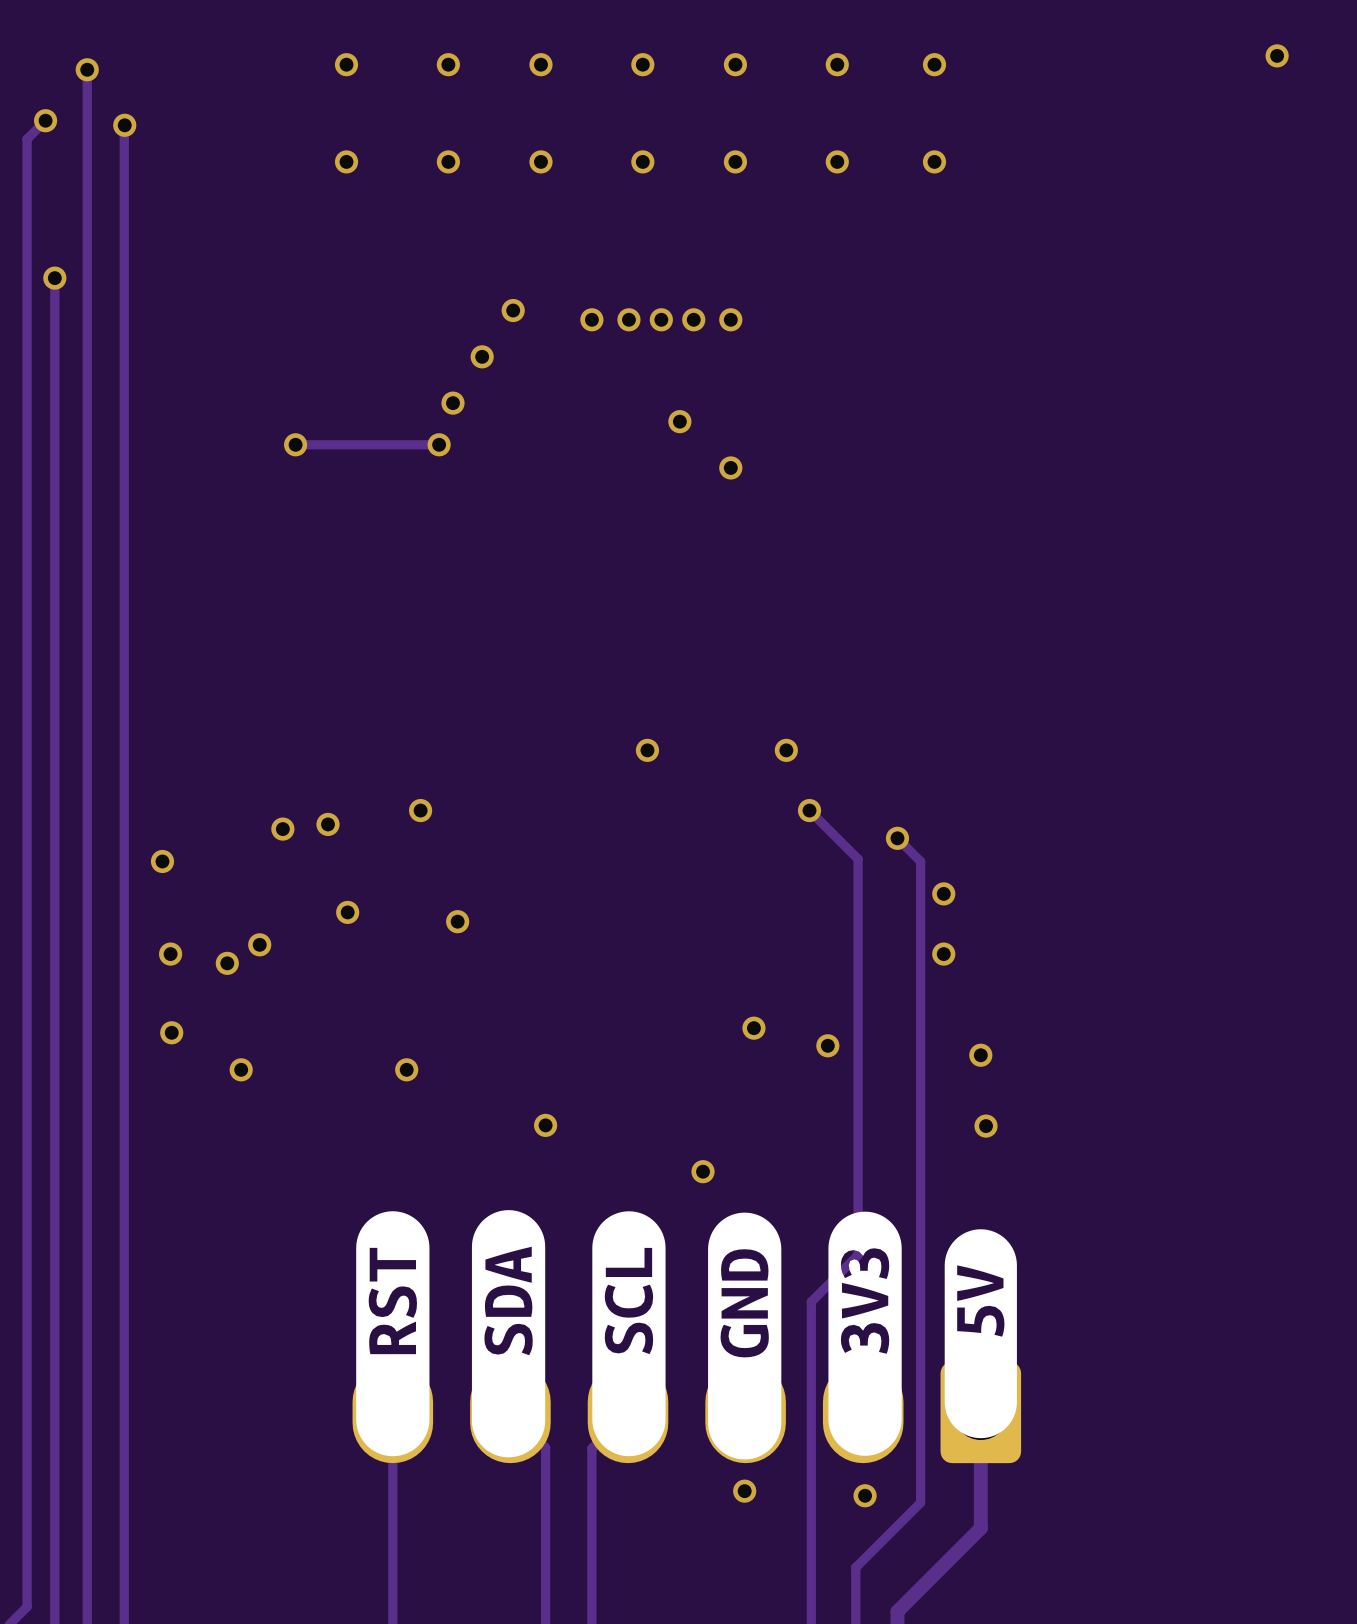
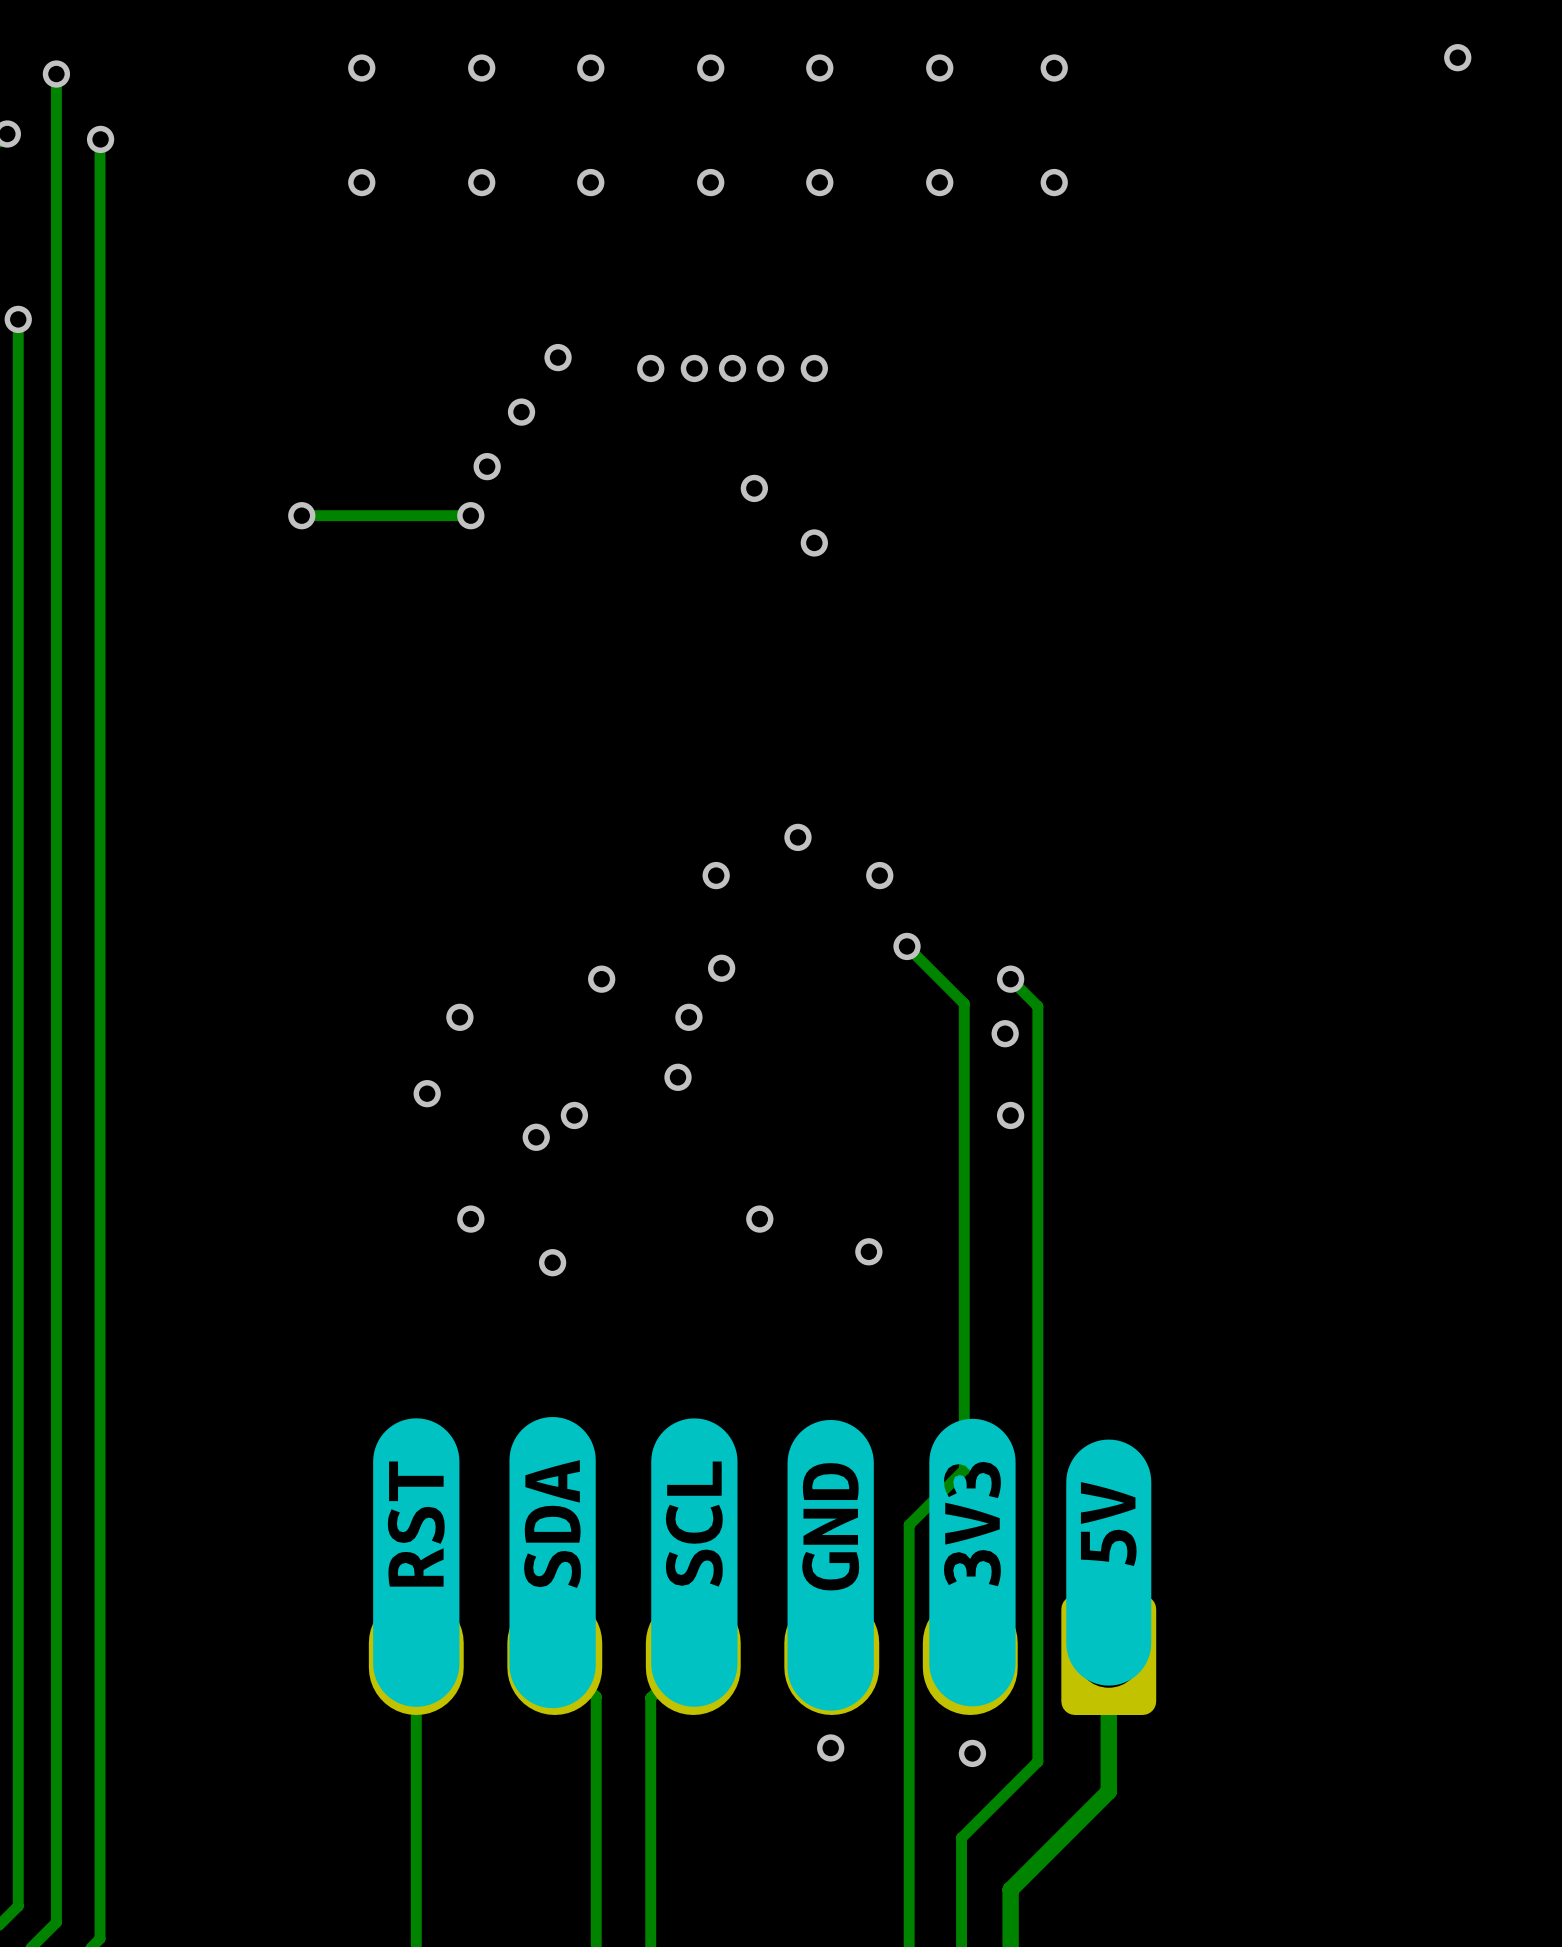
via: none -> (797, 837)
via: (420, 810) -> none
via: (328, 824) -> none
via: (282, 829) -> none
via: none -> (721, 968)
via: none -> (601, 979)
via: (162, 861) -> none
via: none -> (459, 1017)
via: none -> (688, 1017)
via: none -> (1005, 1033)
via: (943, 893) -> none
via: (347, 912) -> none
via: (457, 921) -> none
via: none -> (678, 1077)
via: none -> (427, 1093)
via: (259, 944) -> none
via: (170, 954) -> none
via: none -> (574, 1115)
via: none -> (1010, 1115)
via: (943, 954) -> none
via: (227, 963) -> none
via: none -> (536, 1137)
via: (753, 1028) -> none
via: (171, 1032) -> none
via: none -> (759, 1219)
via: (827, 1045) -> none
via: (980, 1055) -> none
via: (241, 1069) -> none
via position: (406, 1069) -> (470, 1219)
via: none -> (868, 1251)
via: none -> (552, 1262)
via: (545, 1125) -> none
via: (986, 1126) -> none
via: (703, 1171) -> none

